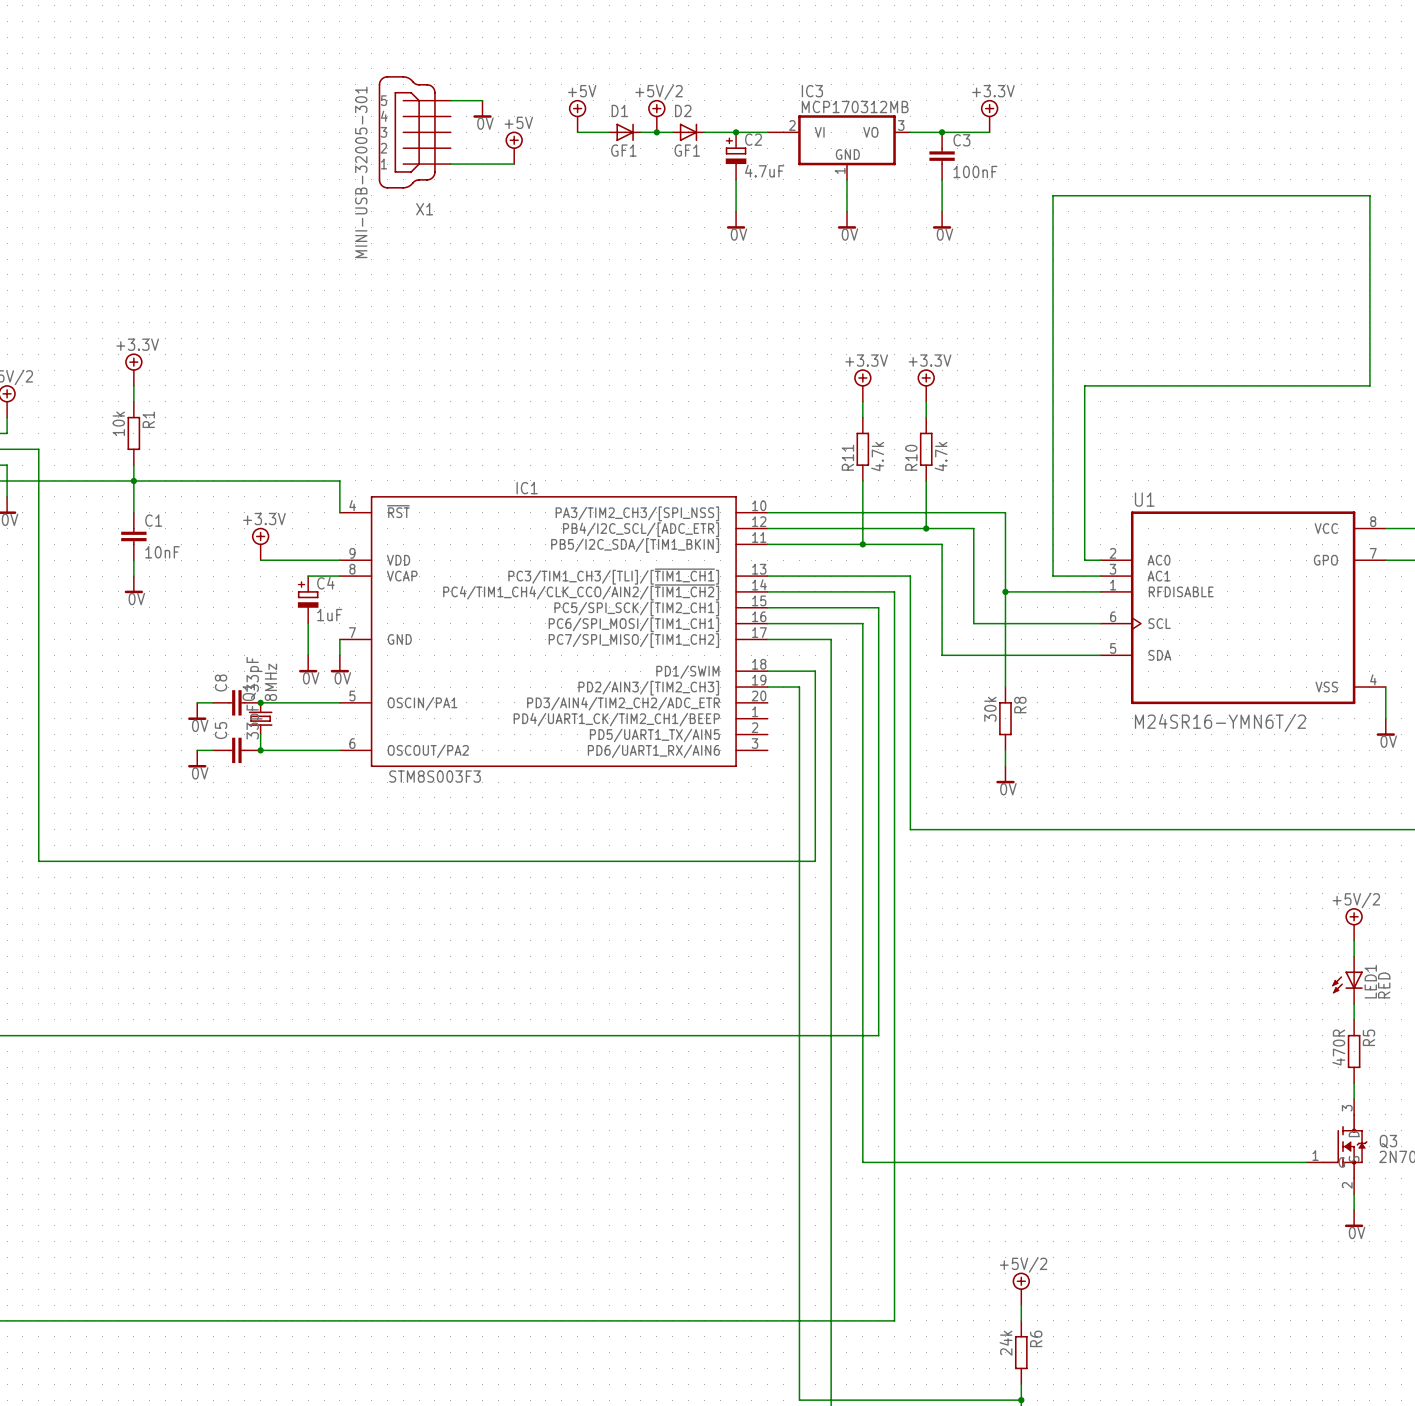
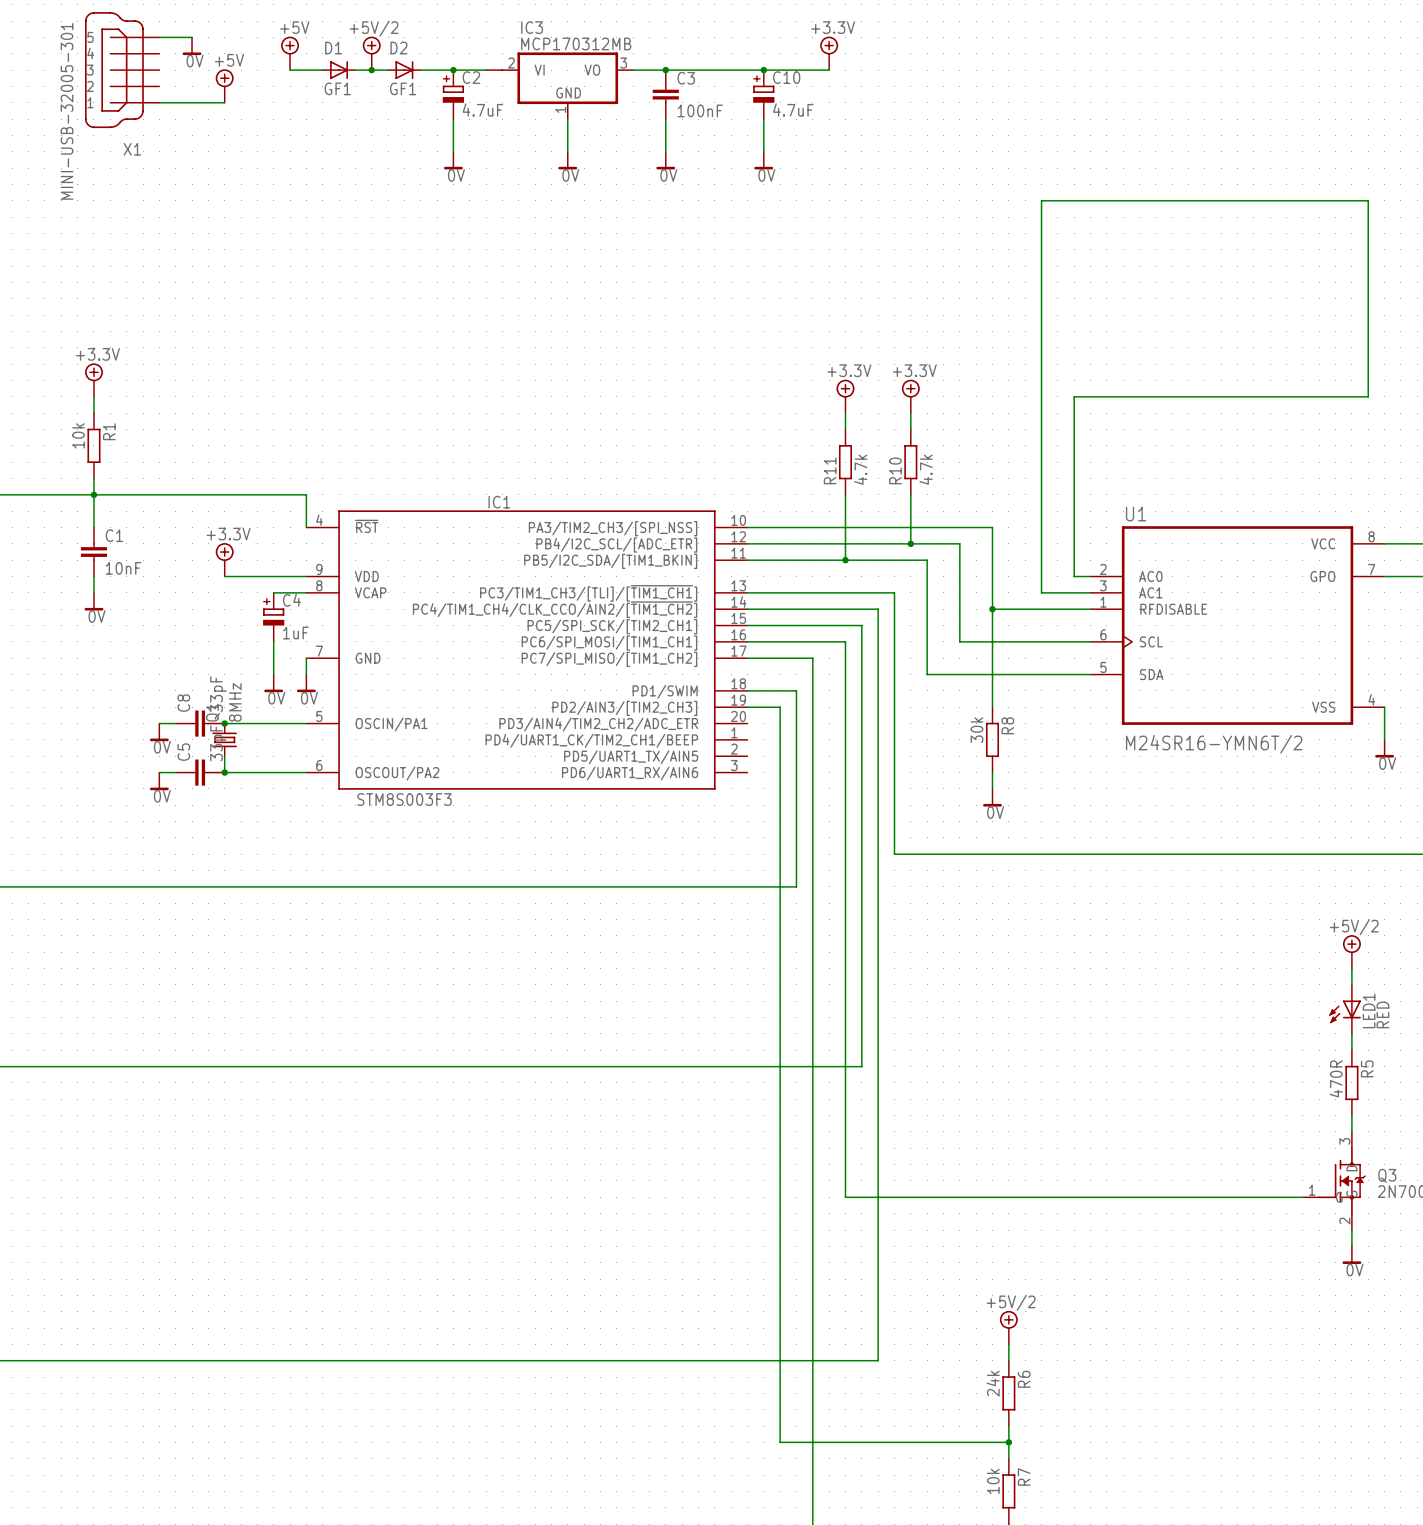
wire: none -> (159, 37) (192, 37)
power symbol: none -> 0V (192, 46)
power symbol: none -> +5V (290, 53)
power symbol: none -> +5V/2 (371, 53)
power symbol: none -> +3.3V (829, 53)
wire: none -> (290, 70) (322, 70)
junction: none -> (371, 70)
junction: none -> (453, 70)
wire: none -> (633, 70) (829, 70)
junction: none -> (665, 70)
junction: none -> (763, 70)
power symbol: none -> +5V (224, 86)
C10: none -> 4.7uF (763, 94)
wire: none -> (159, 102) (224, 102)
wire: (450, 100) (482, 100) -> (355, 70) (388, 70)
power symbol position: 0V (482, 109) -> 0V (453, 160)
wire: none -> (453, 119) (453, 151)
power symbol: +5V (577, 116) -> none
wire: none -> (567, 119) (567, 151)
power symbol: +5V/2 (656, 116) -> none
wire: none -> (665, 119) (665, 151)
power symbol: +3.3V (989, 116) -> none
X1 position: (414, 132) -> (122, 70)
wire: (577, 132) (609, 132) -> none
D1 position: (625, 132) -> (339, 70)
wire: (640, 132) (672, 132) -> none
junction: (656, 132) -> none
D2 position: (688, 132) -> (404, 70)
wire: (704, 132) (767, 132) -> none
junction: (736, 132) -> none
wire: (910, 132) (989, 132) -> none
junction: (942, 132) -> none
power symbol: +5V (514, 147) -> none
IC3 position: (839, 147) -> (559, 85)
power symbol: none -> 0V (567, 160)
power symbol: none -> 0V (665, 160)
C2 position: (736, 156) -> (453, 94)
power symbol: none -> 0V (763, 160)
C3 position: (942, 156) -> (665, 94)
wire: (450, 164) (514, 164) -> (420, 70) (486, 70)
wire: (736, 179) (736, 211) -> (763, 119) (763, 151)
wire: (846, 179) (846, 211) -> none
wire: (942, 179) (942, 211) -> none
power symbol: 0V (736, 220) -> none
power symbol: 0V (846, 220) -> none
power symbol: 0V (942, 220) -> none

